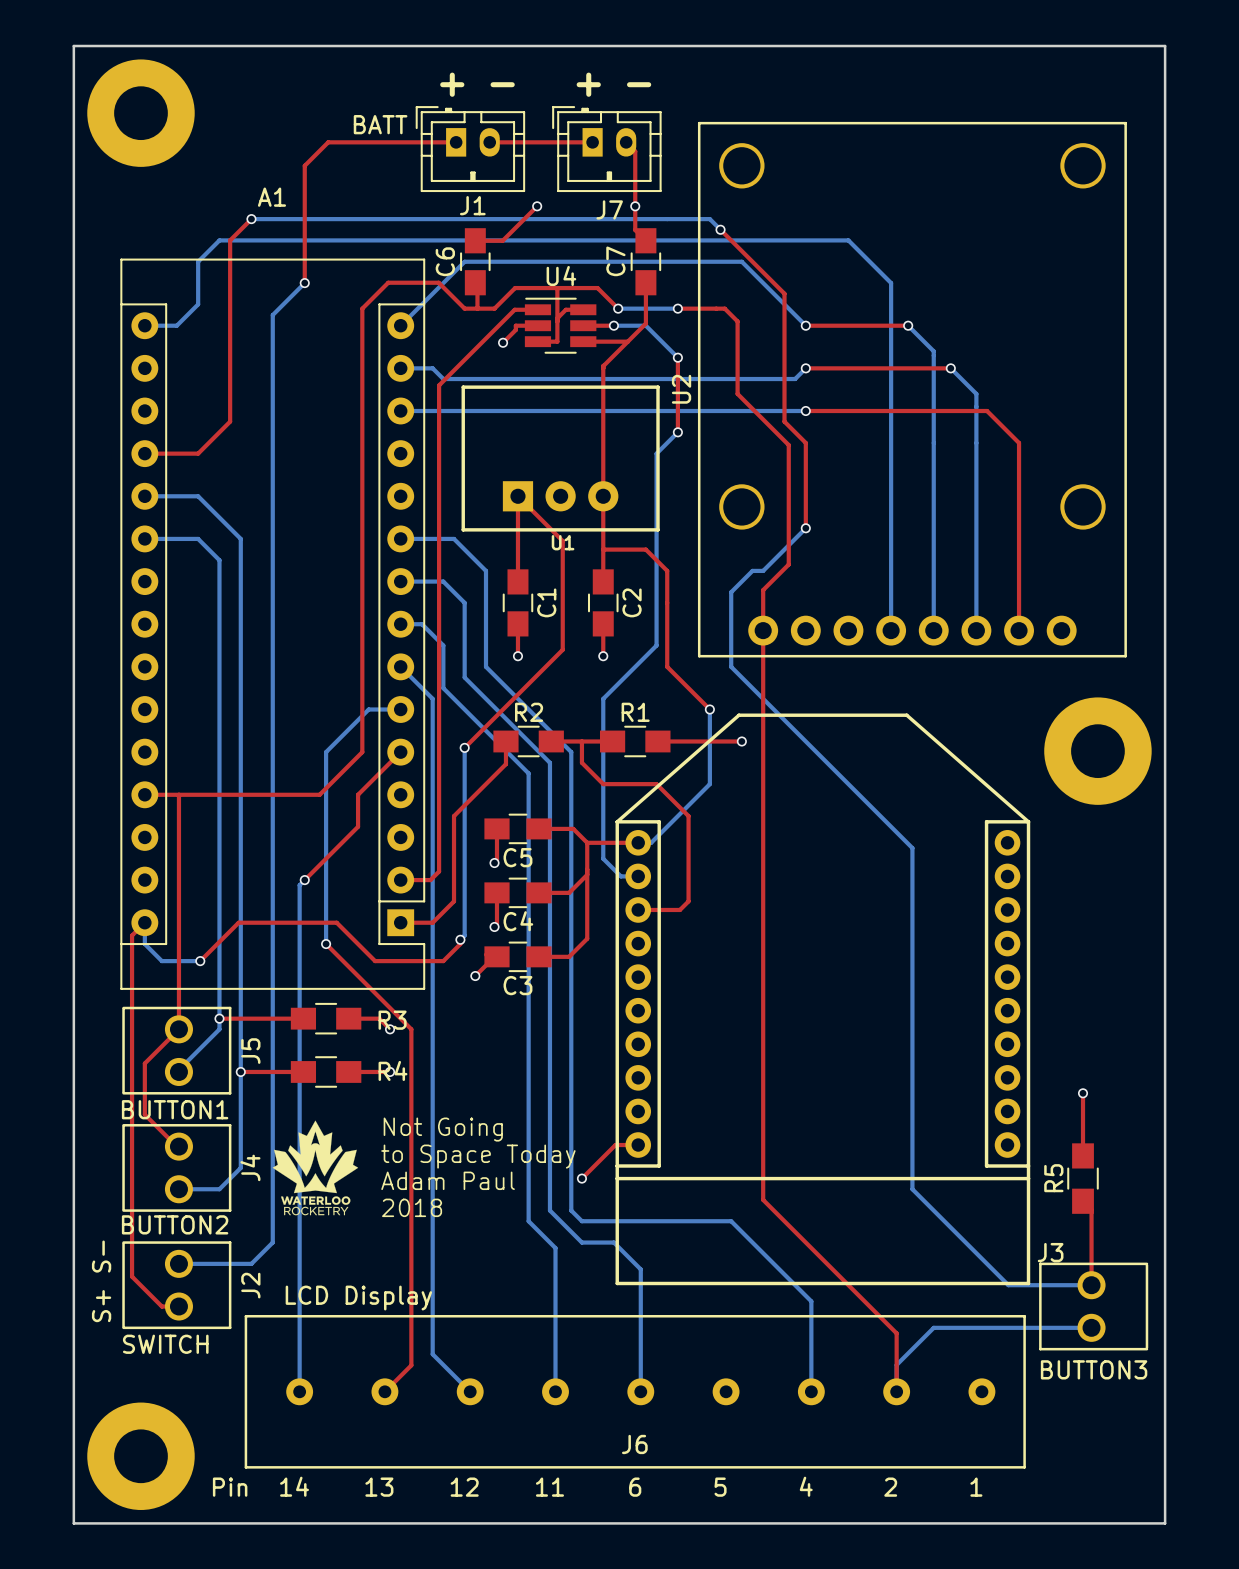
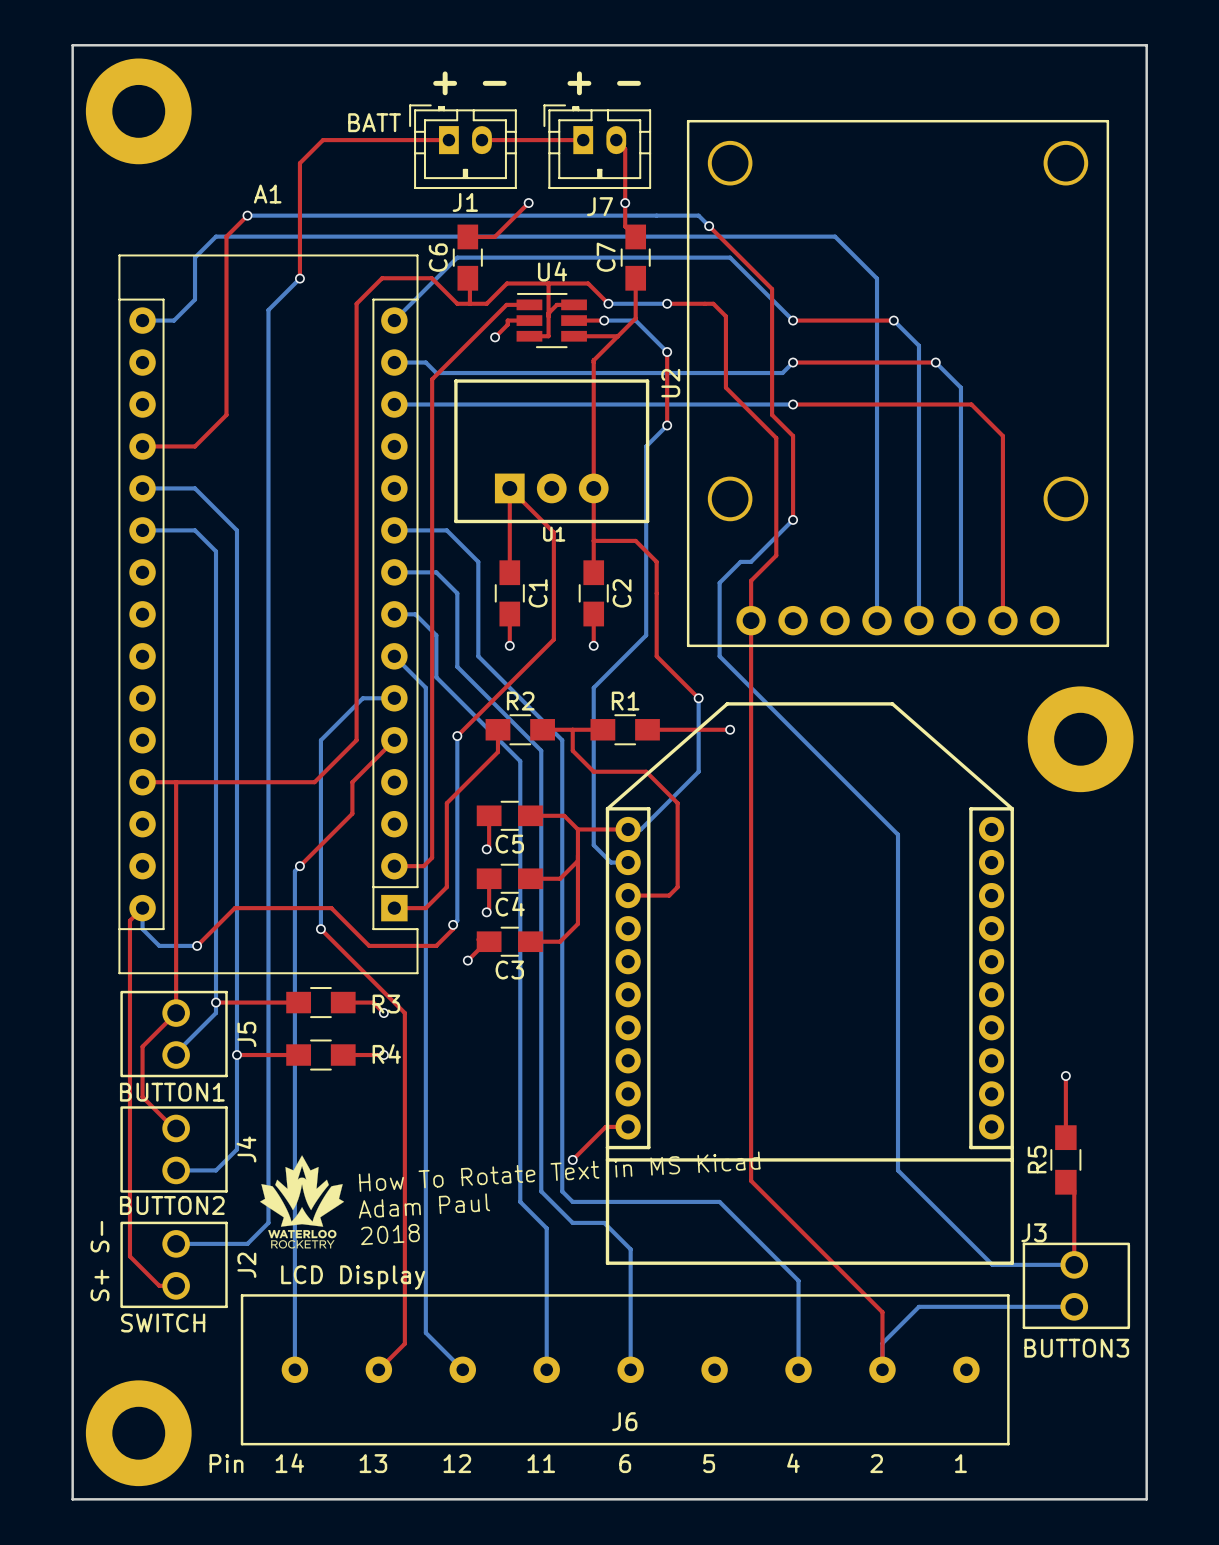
text: Not Going (443, 1129) -> none
text: to Space Today (478, 1156) -> none
drawing position: (315, 1167) -> (302, 1201)
text rotation: 0° (448, 1180) -> 3.2° counterclockwise (424, 1205)
text: none -> How To Rotate Text in MS Kicad (559, 1171)
text rotation: 0° (412, 1207) -> 3.2° counterclockwise (390, 1234)

